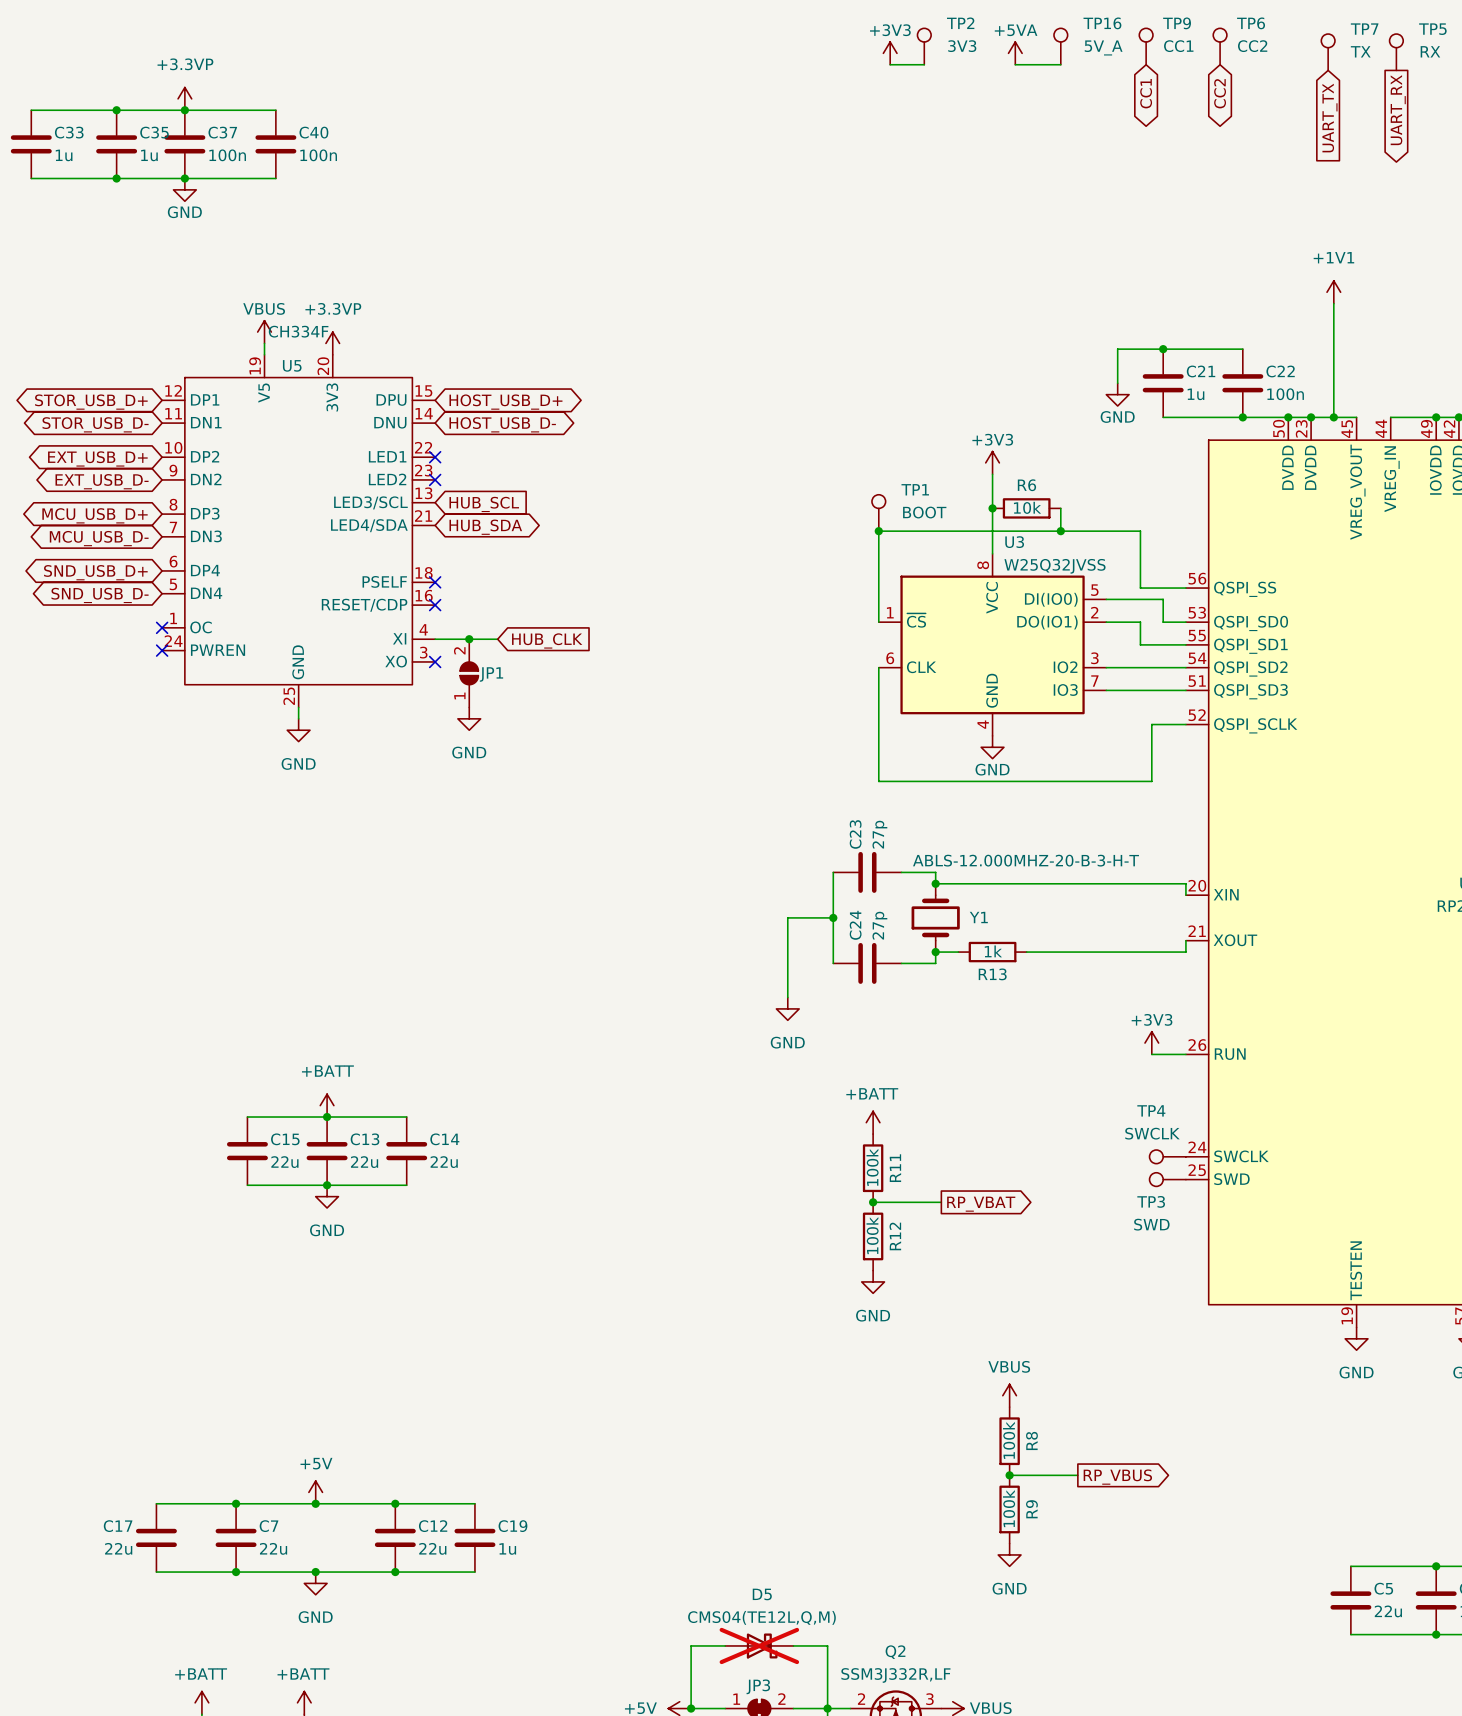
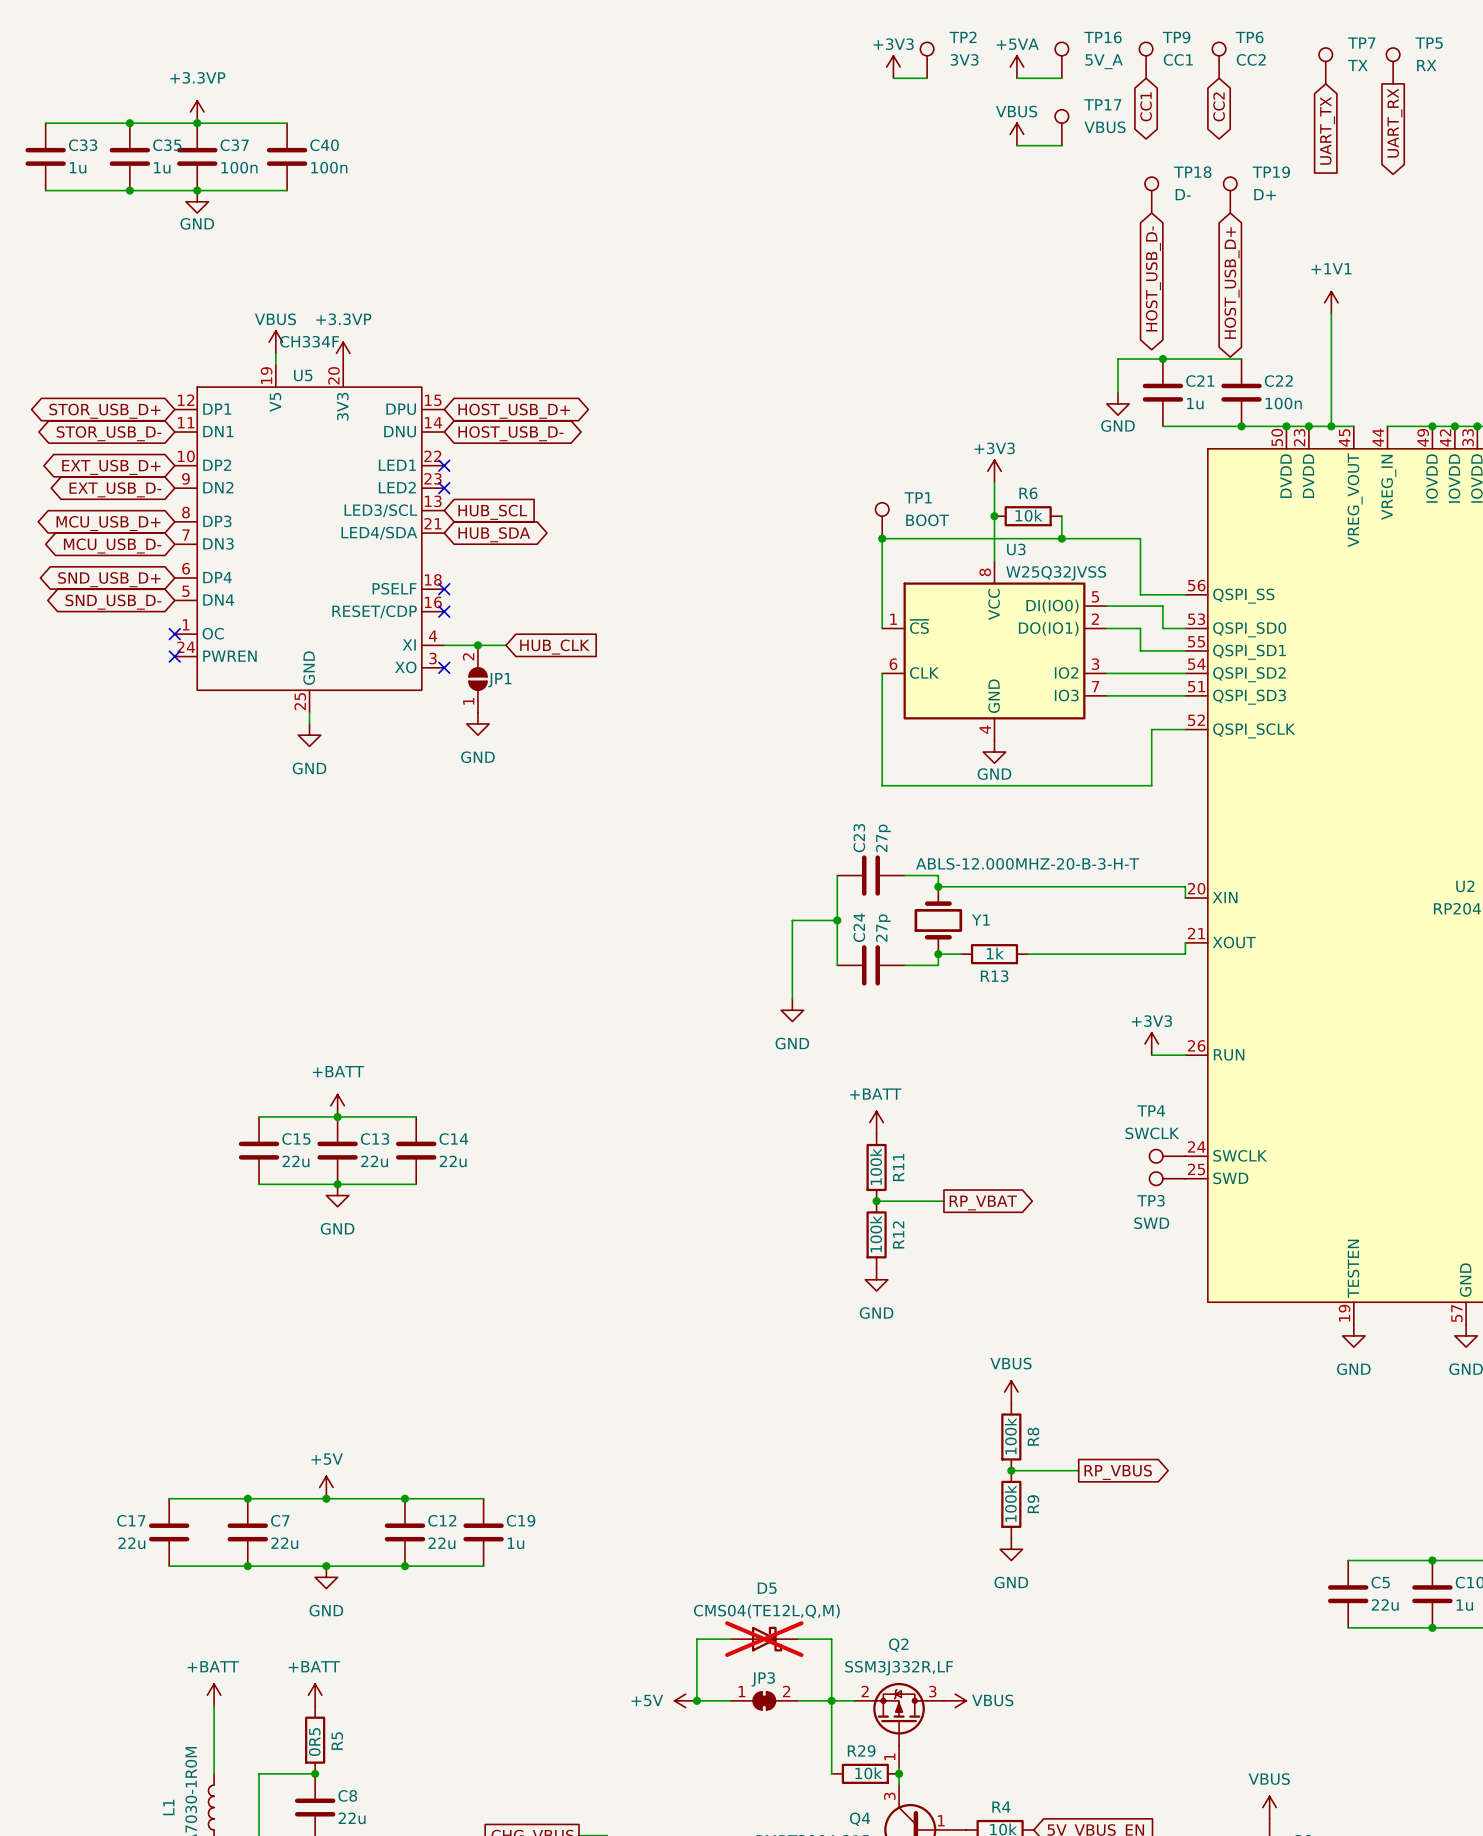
TP17: none -> VBUS (1061, 127)
power symbol: none -> VBUS (1016, 134)
wire: none -> (1016, 145) (1061, 145)
TP18: none -> D- (1151, 195)
TP19: none -> D+ (1230, 195)
global label: none -> HOST_USB_D- (1153, 278)
global label: none -> HOST_USB_D+ (1232, 283)

